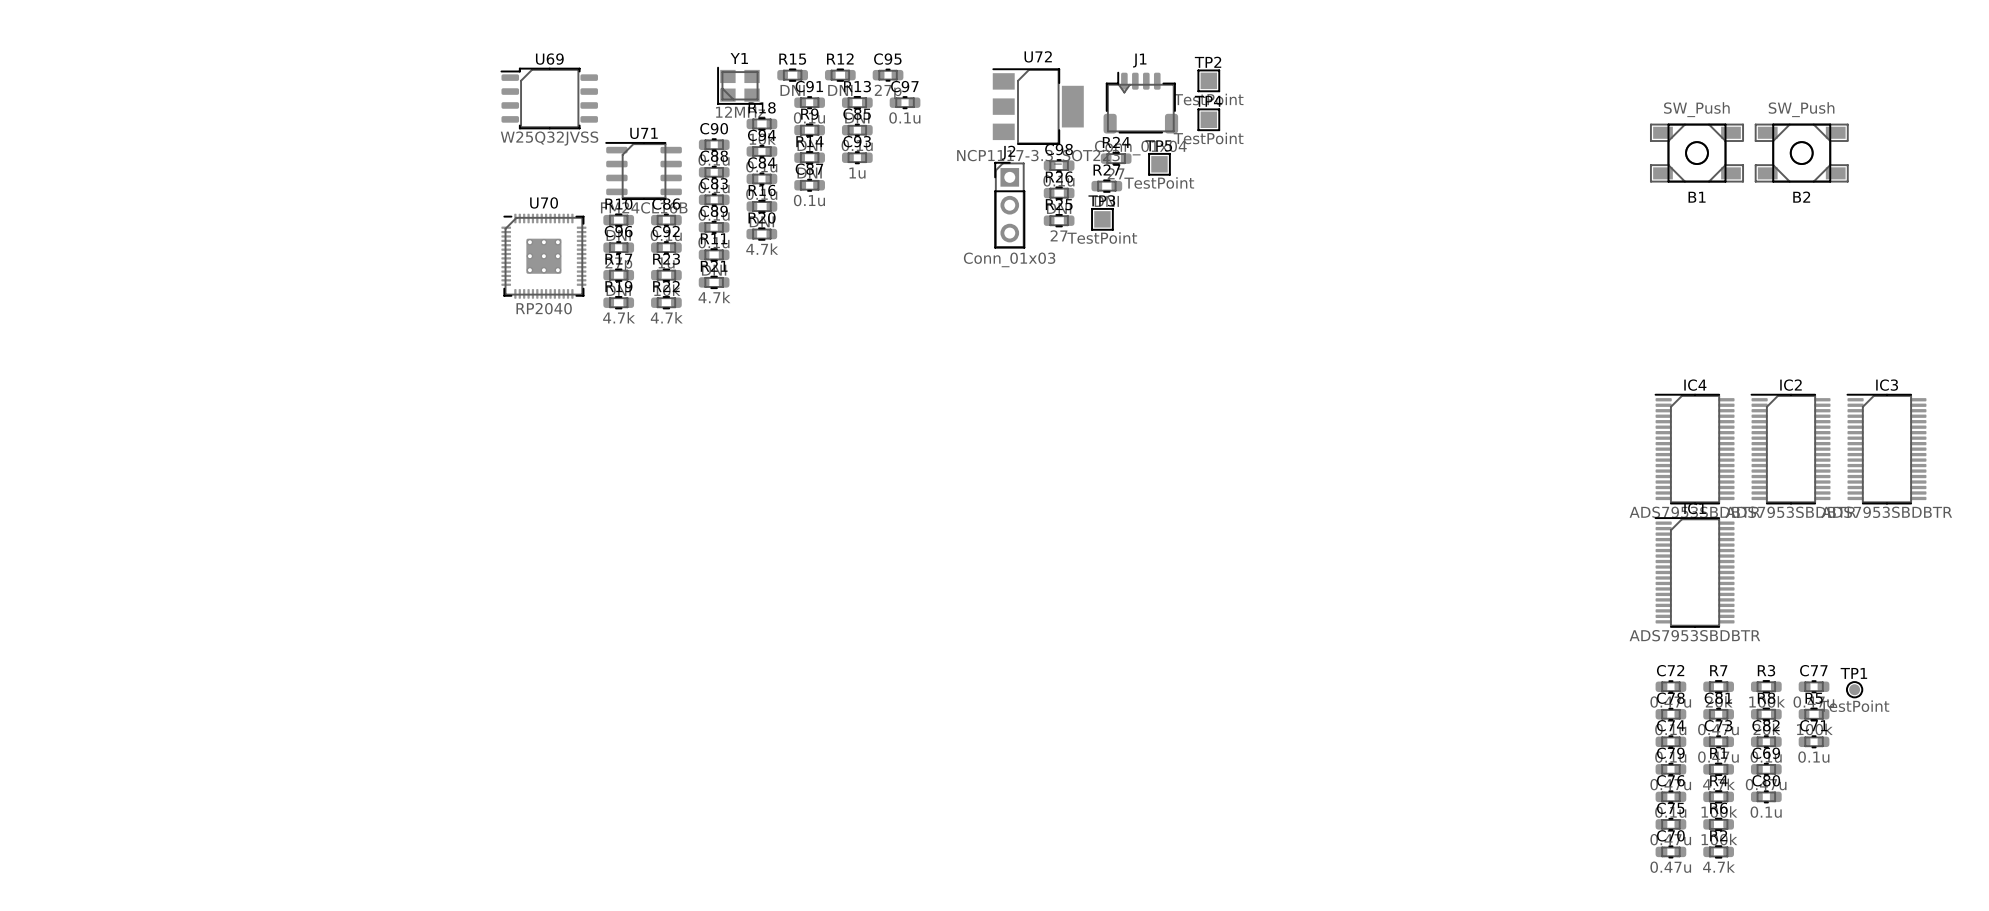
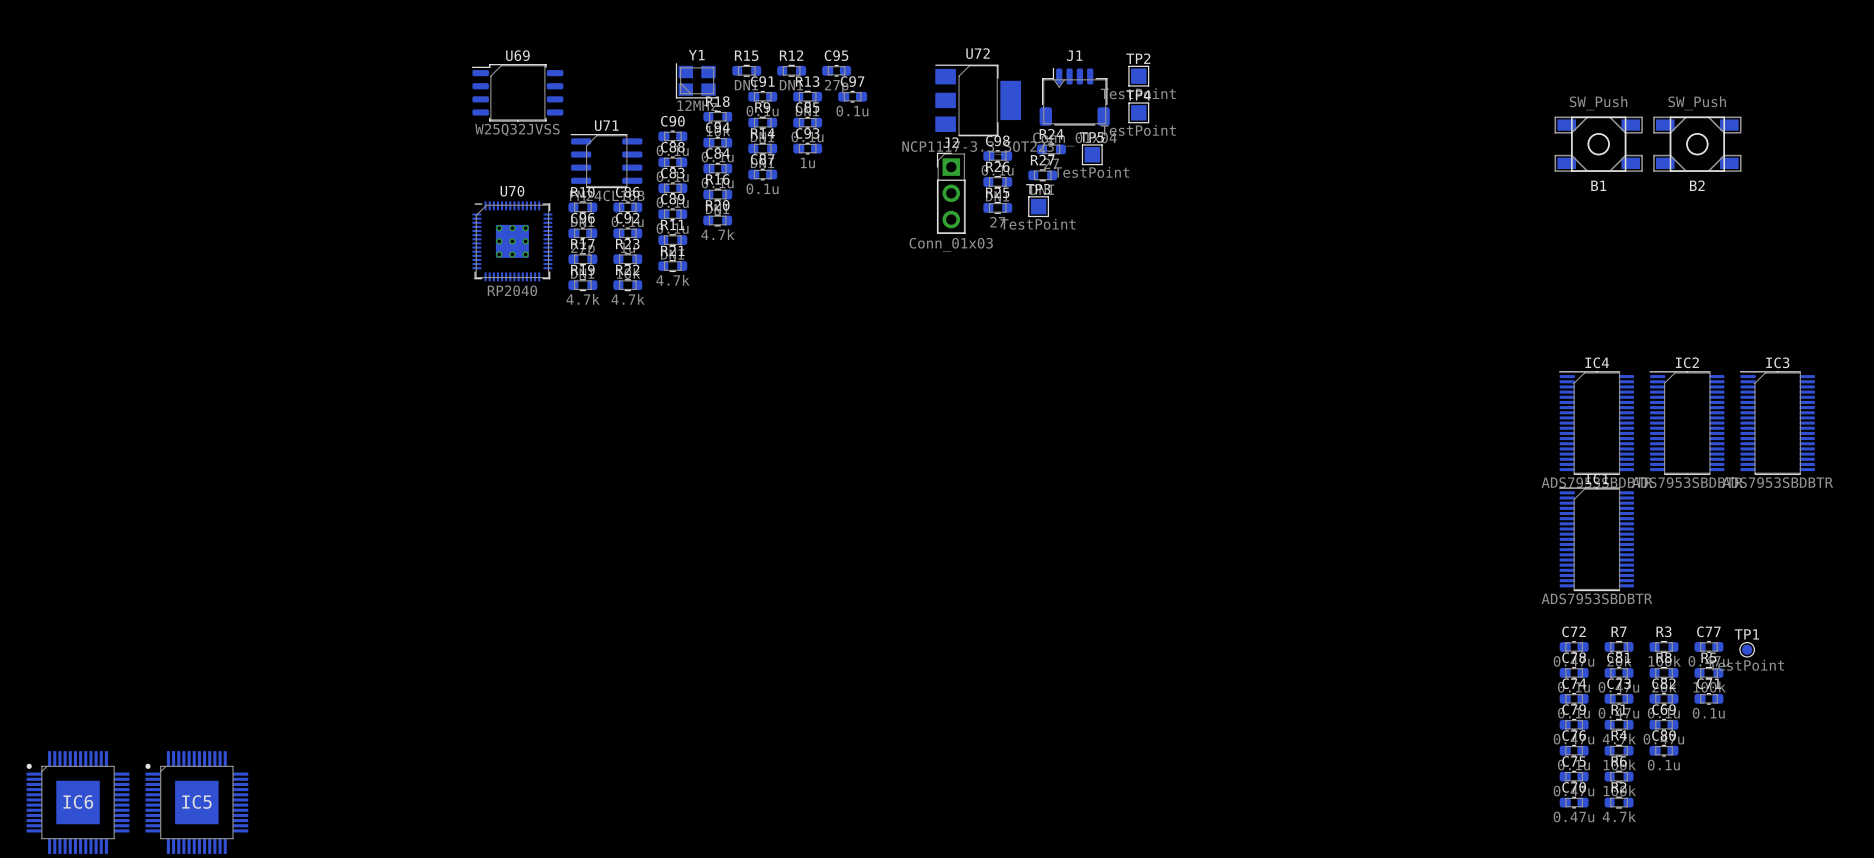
IC6: none -> (78, 802)
IC5: none -> (196, 802)

